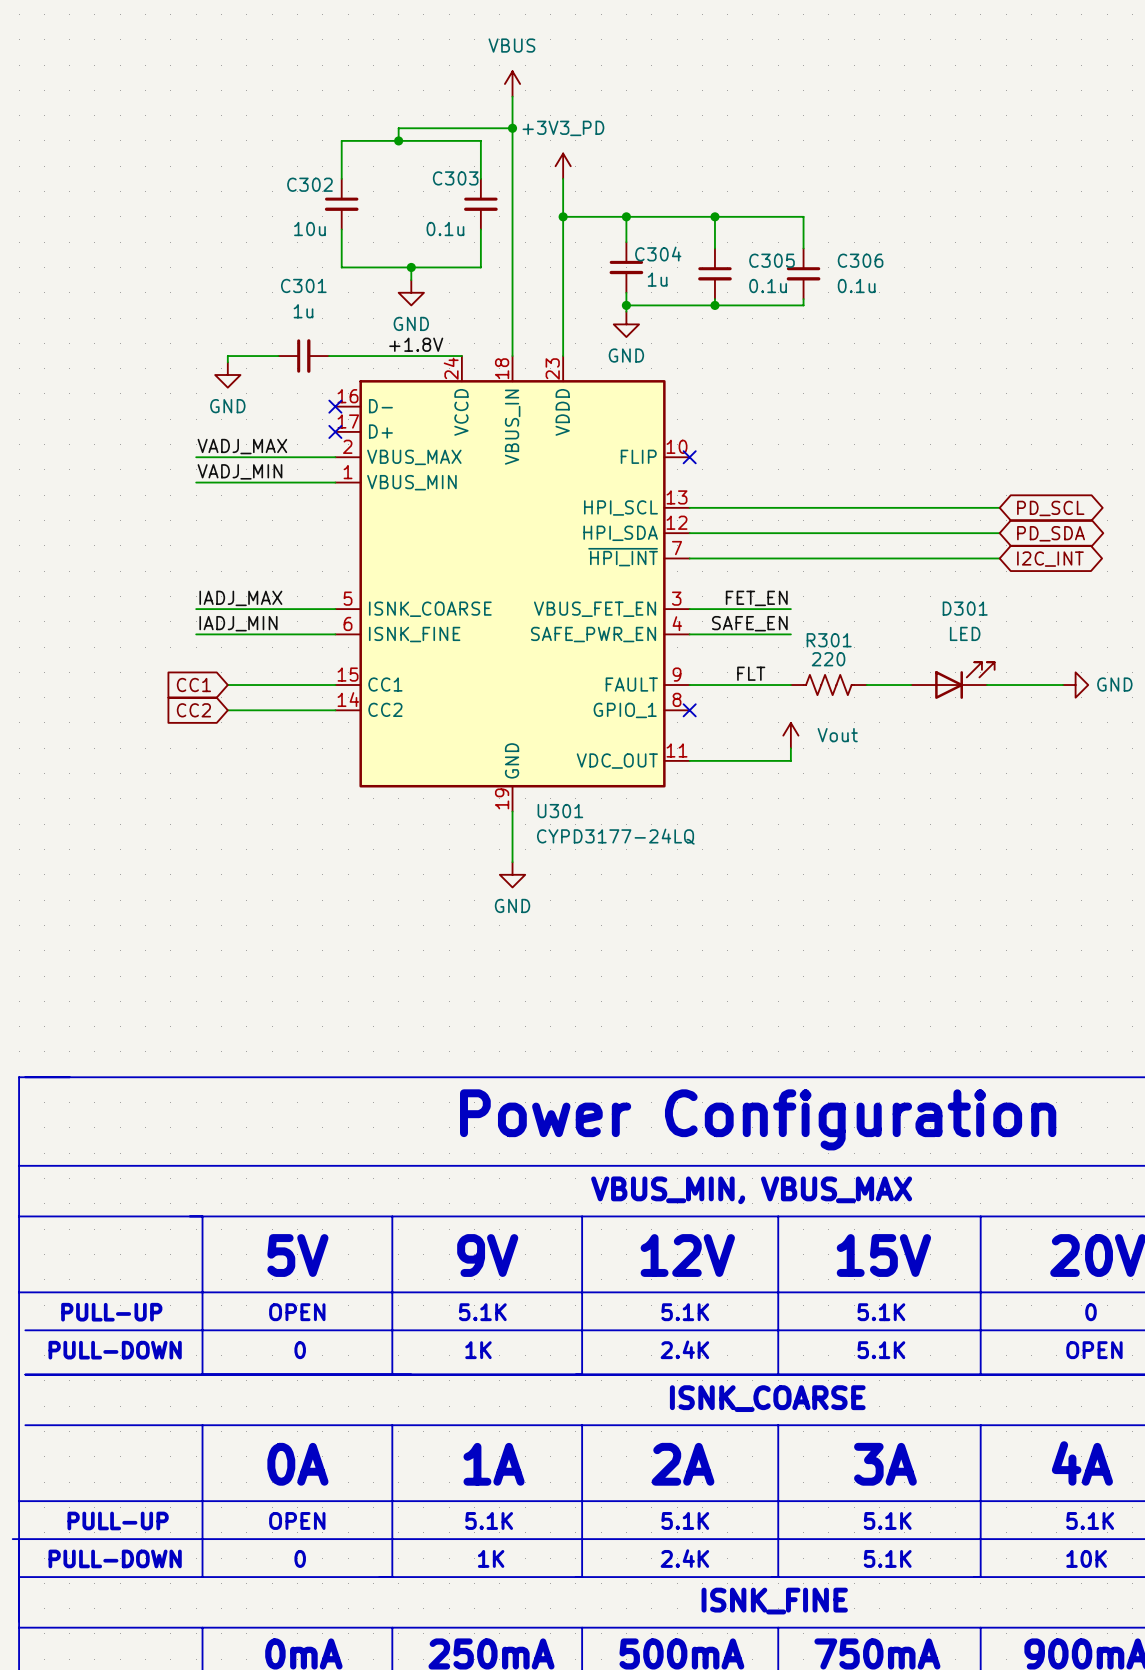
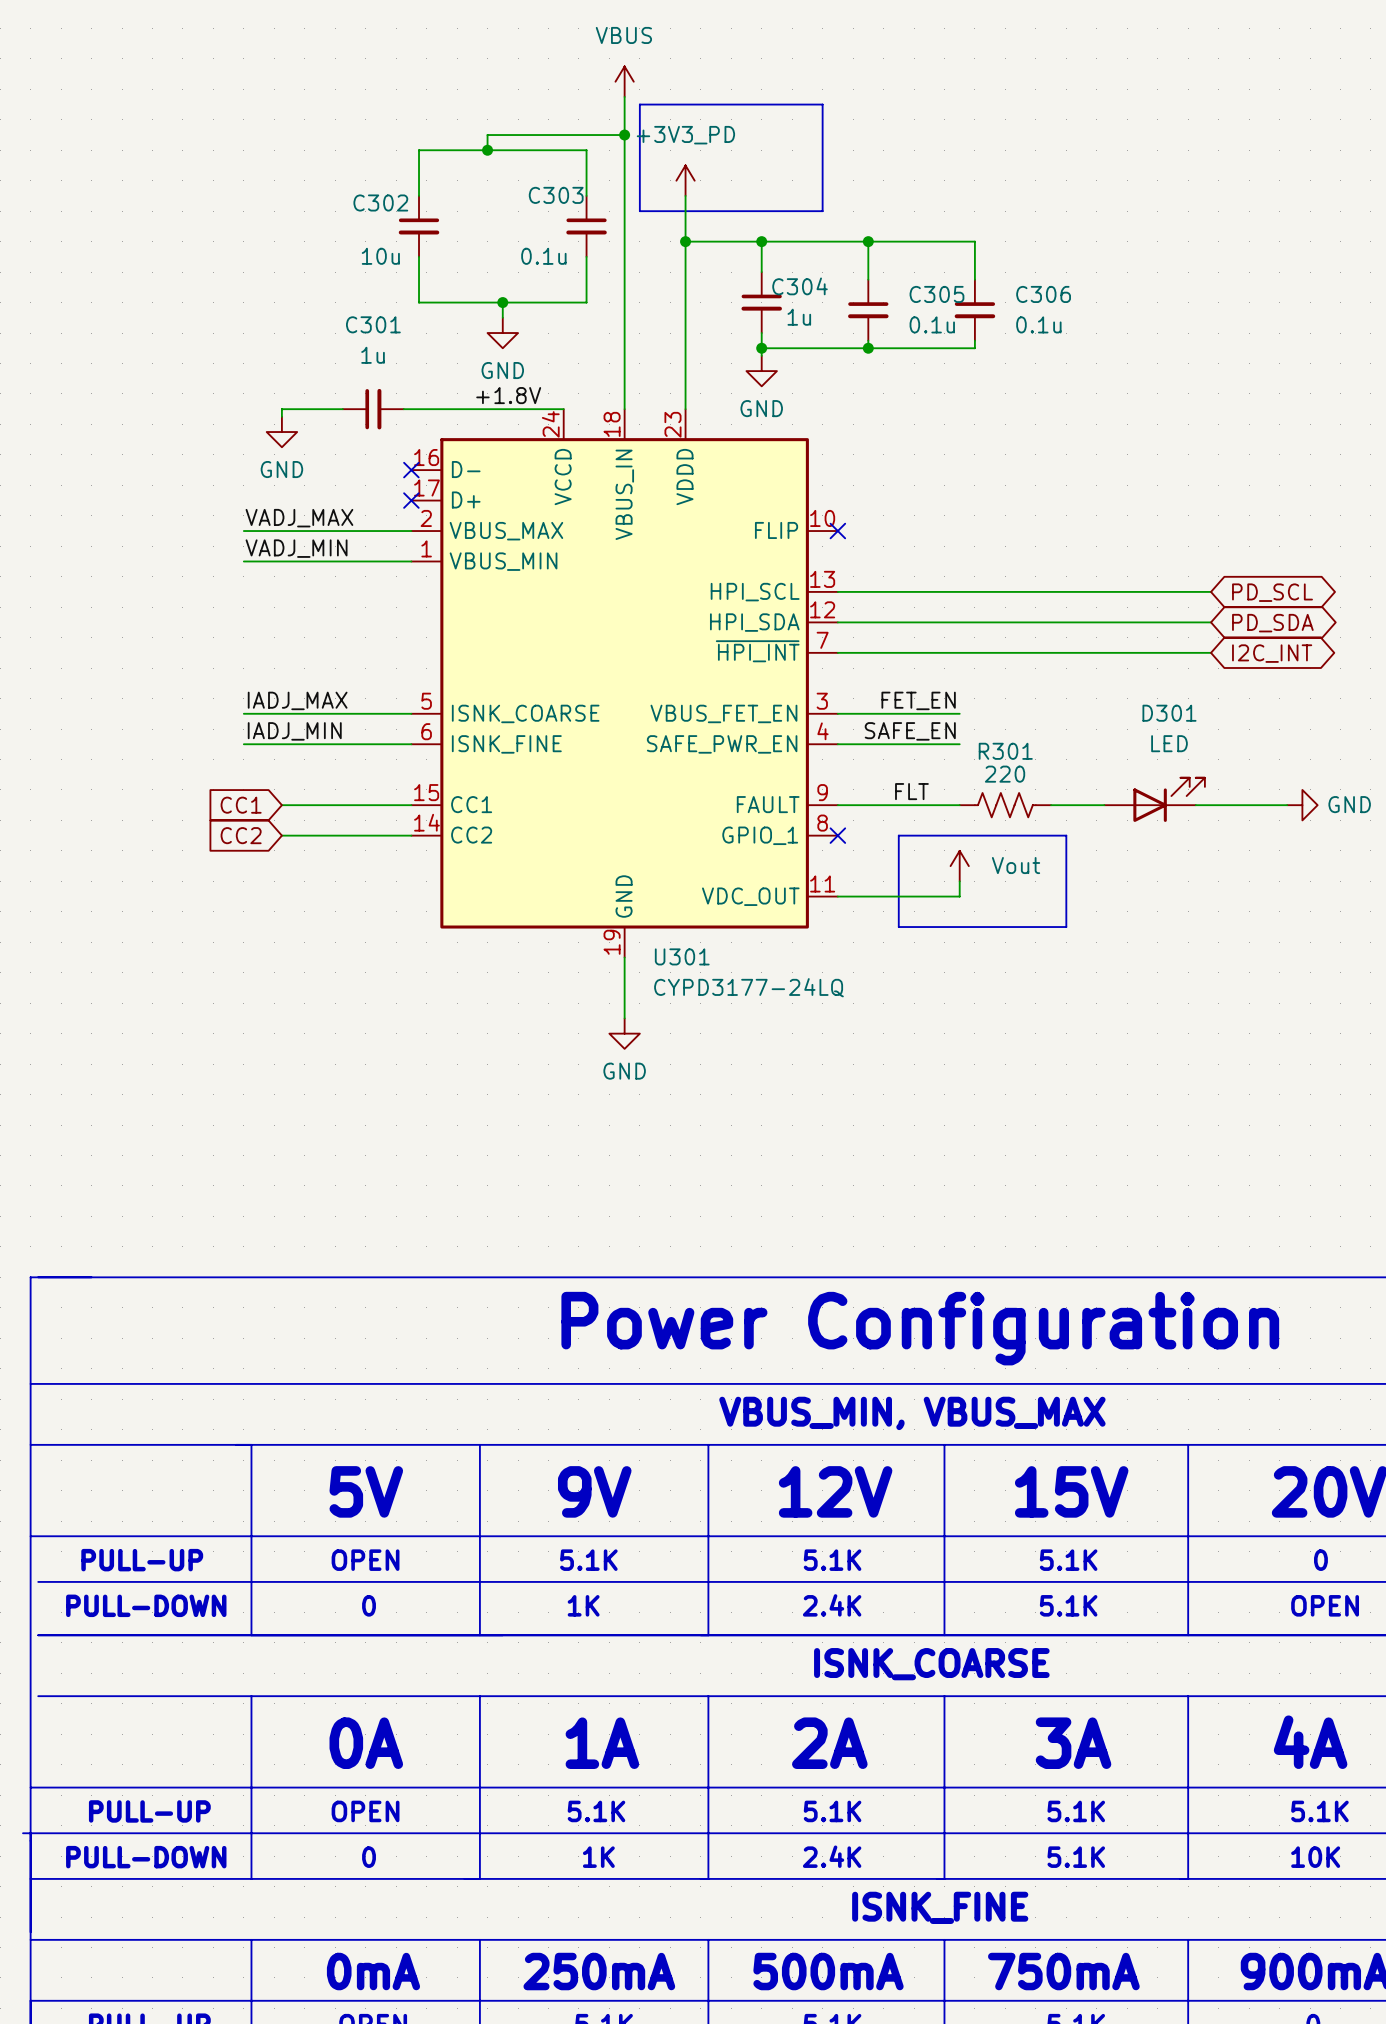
line: none -> (639, 104) (822, 104) (822, 211) (639, 211) (639, 104)
line: none -> (898, 835) (1066, 835) (1066, 927) (898, 927) (898, 835)

